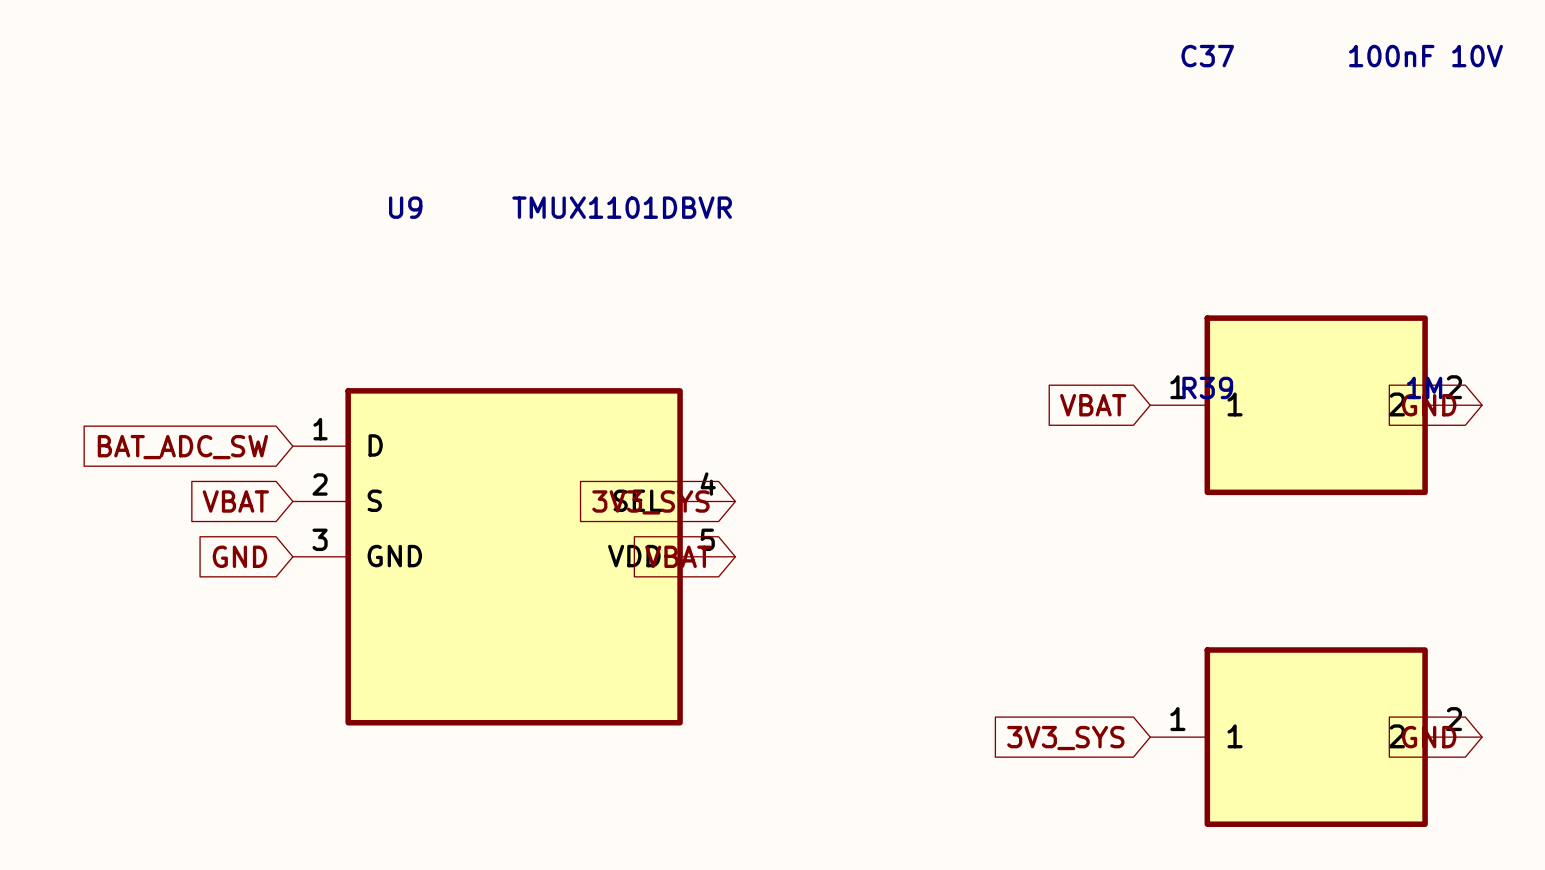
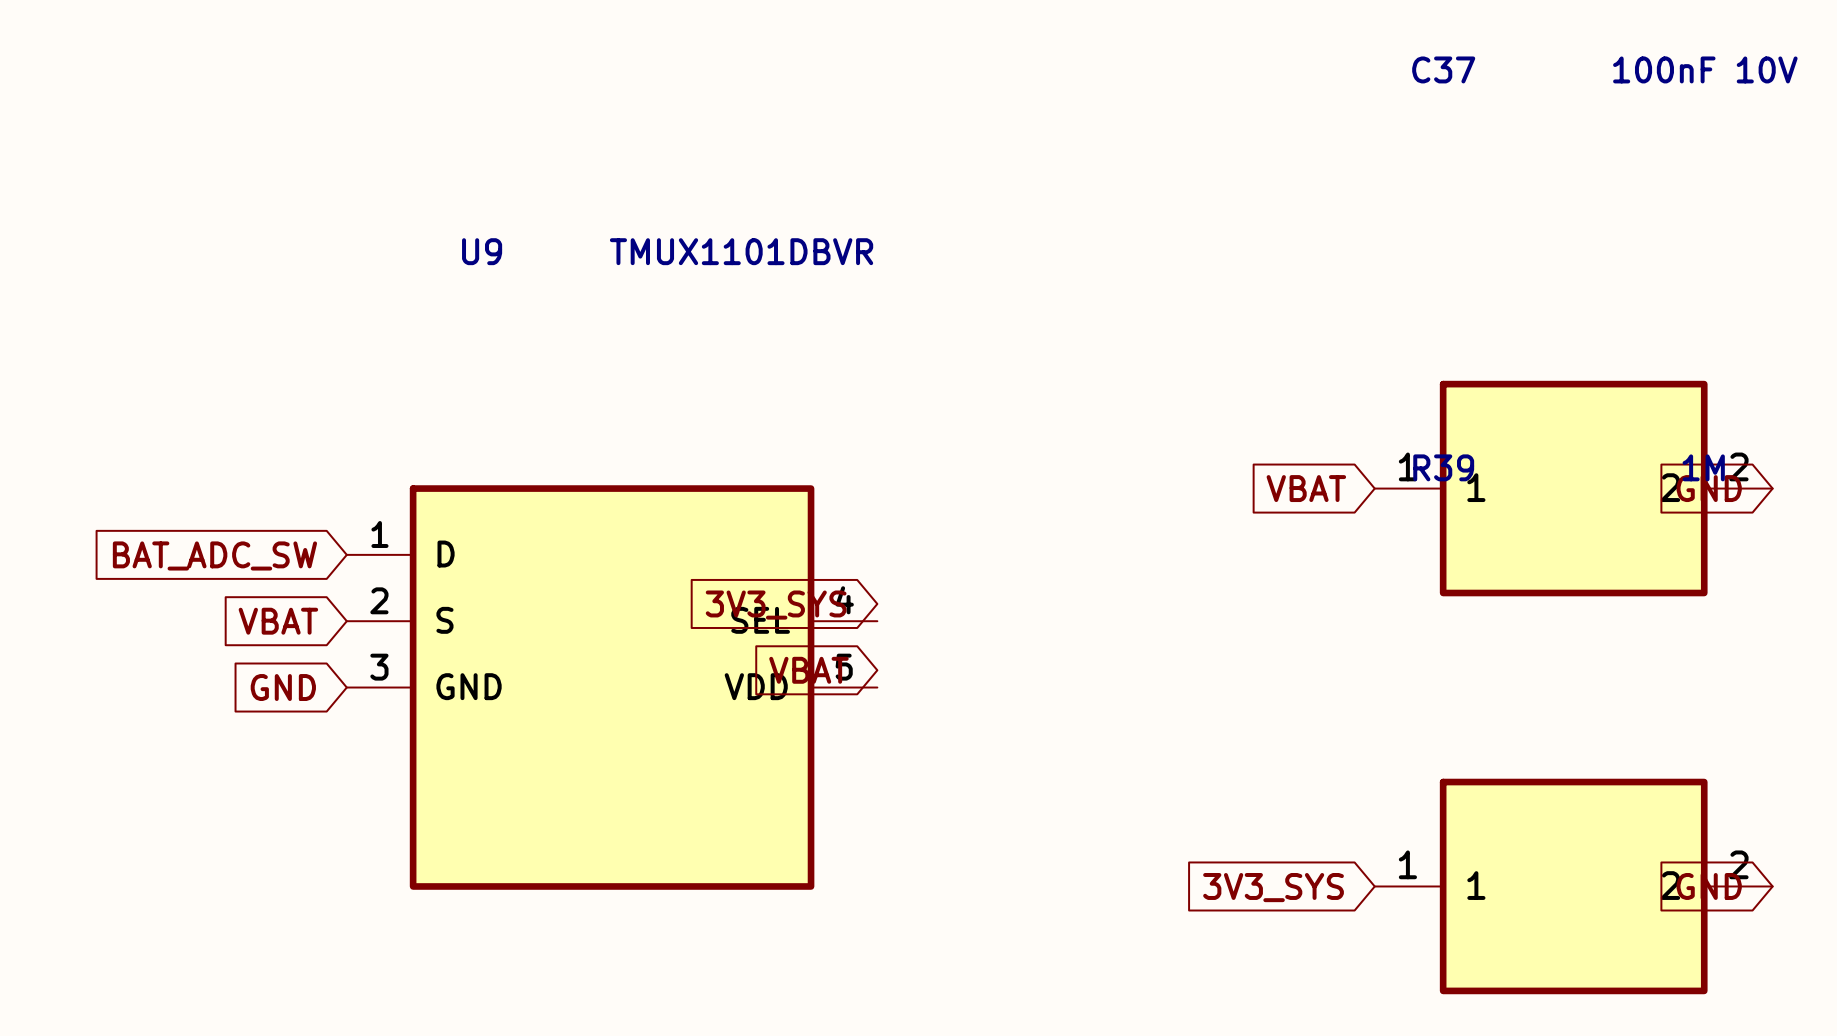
global label position: BAT_ADC_SW (182, 447) -> BAT_ADC_SW (214, 555)
global label position: VBAT (235, 501) -> VBAT (278, 621)
global label position: GND (239, 556) -> GND (283, 687)
U9 position: (514, 556) -> (612, 687)

